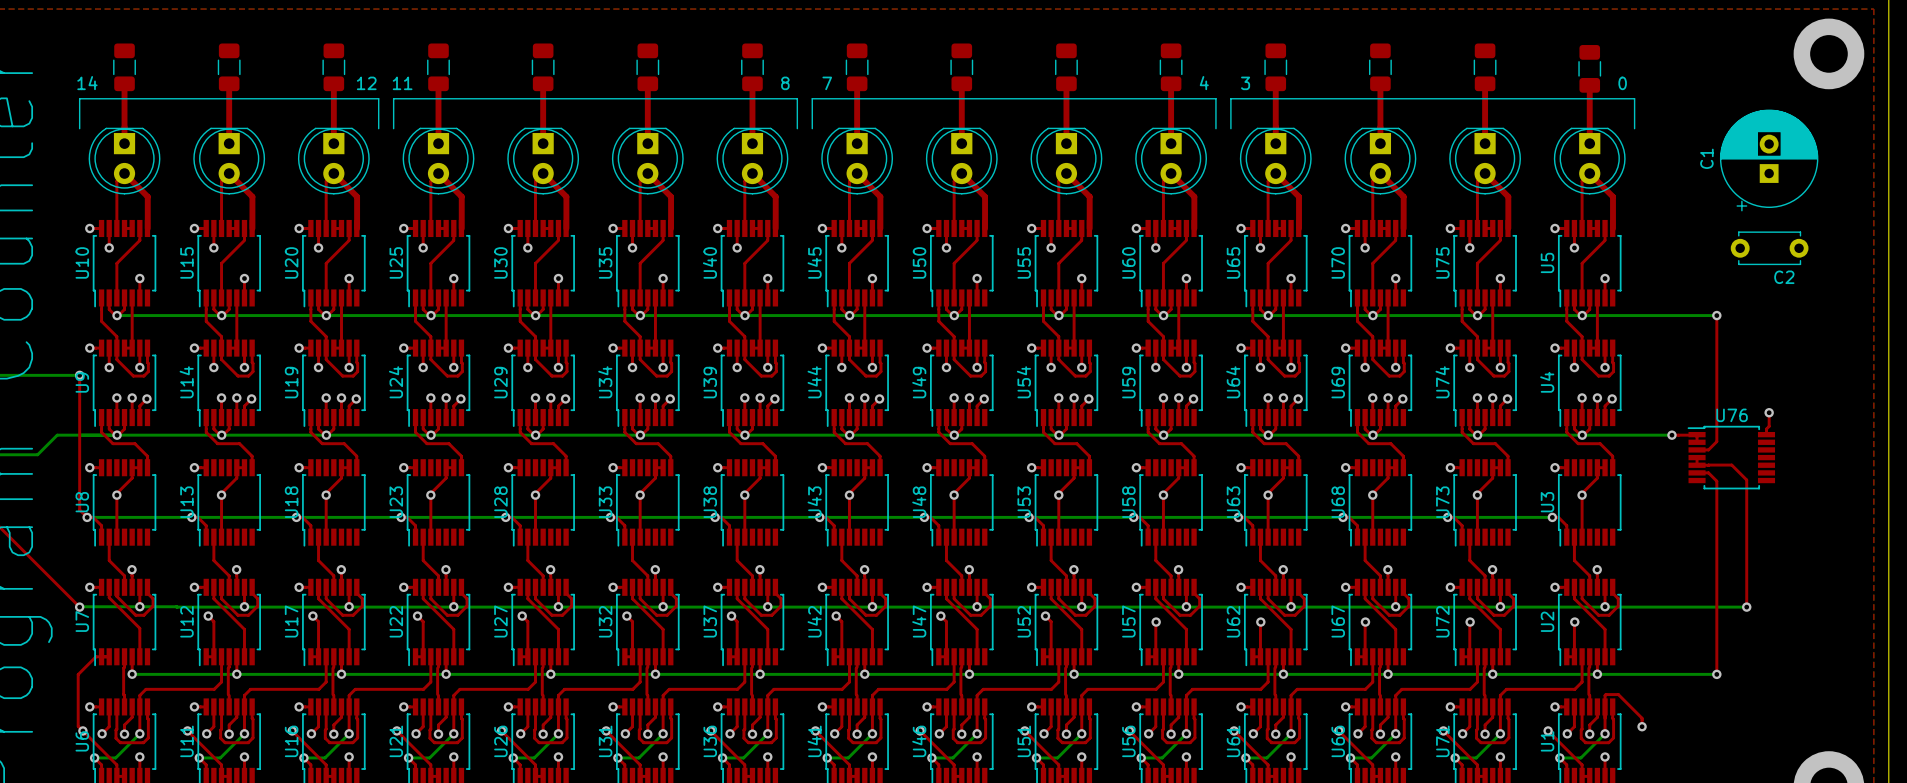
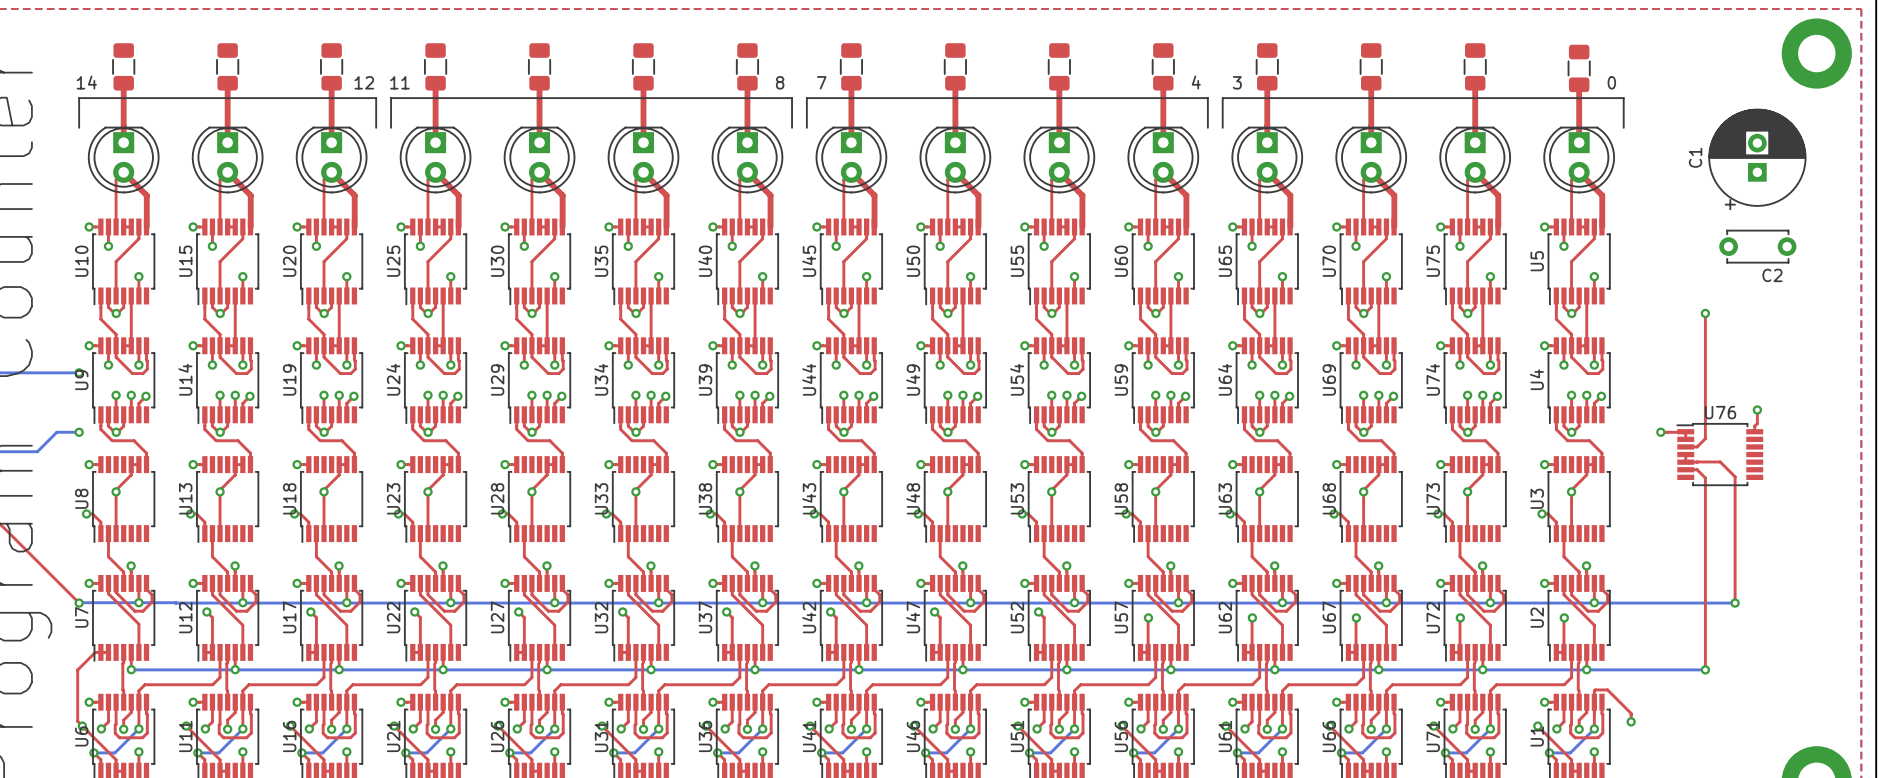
bottom track: (117, 315) (1716, 315) -> none
top track: (79, 375) (79, 509) (87, 517) -> none
bottom track: (79, 435) (1671, 435) -> none
via: none -> (79, 432)
bottom track: (87, 517) (1552, 517) -> none

